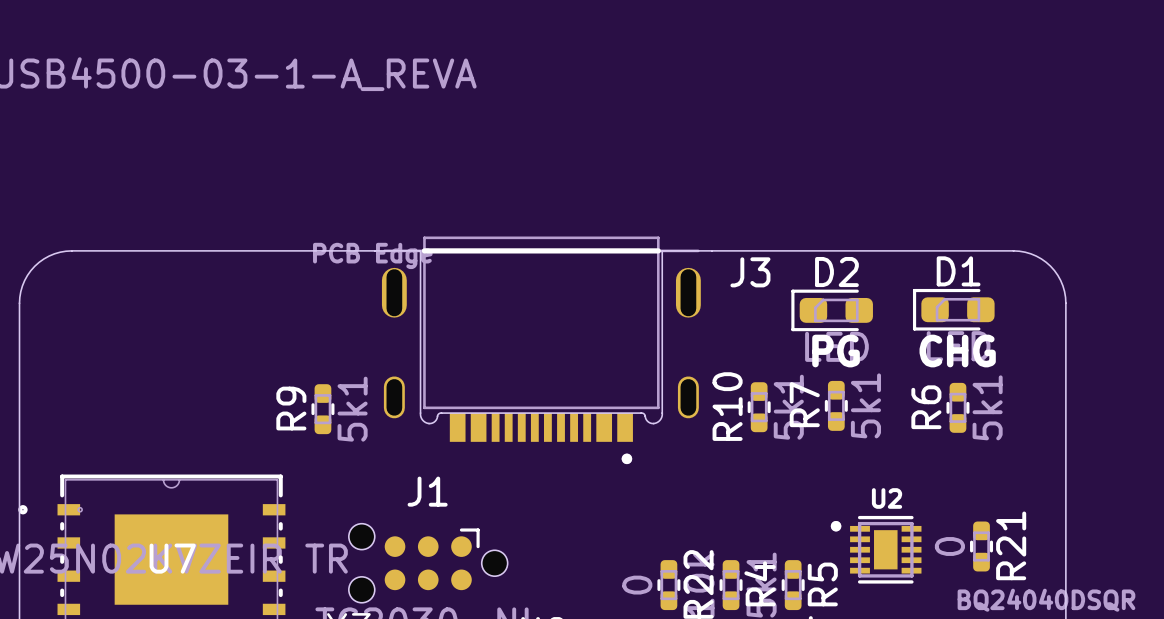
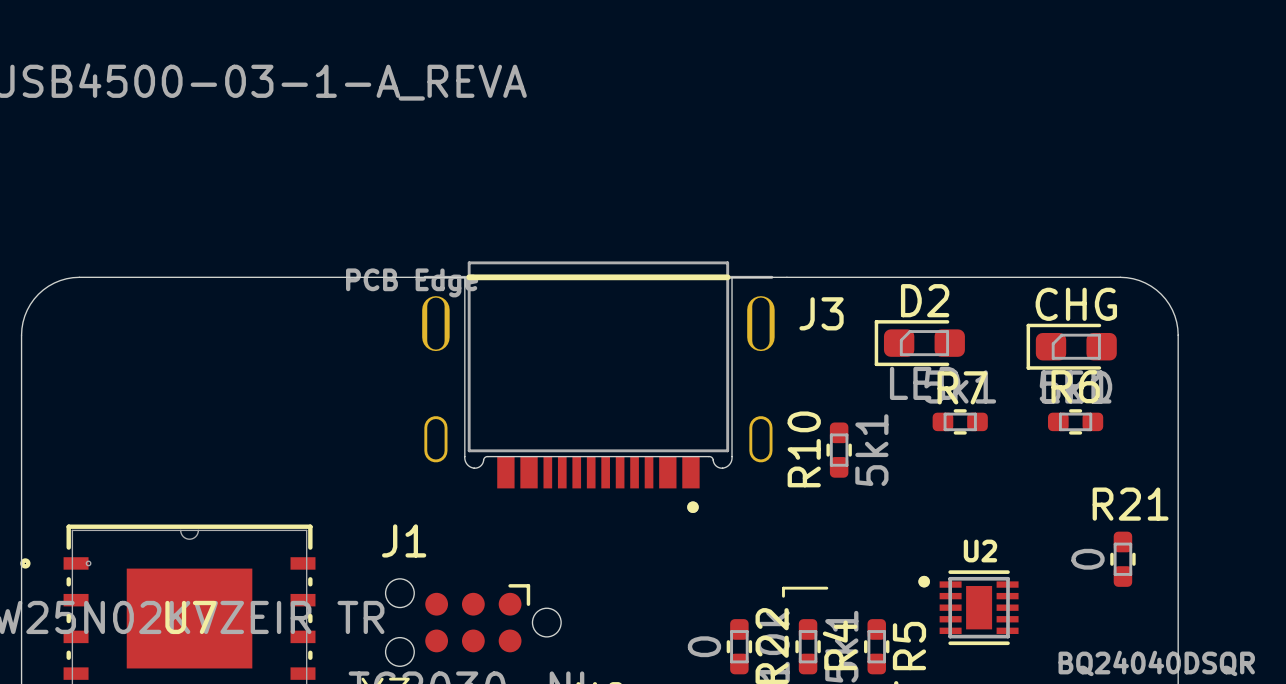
D1 name: D1 (958, 271) -> CHG (1076, 304)
J3 name position: J3 (750, 272) -> J3 (821, 313)
D1 position: (953, 309) -> (1071, 346)
text: PG (836, 351) -> none
text: CHG (957, 351) -> none
R7 rotation: 0° (836, 405) -> 90° clockwise (960, 421)
R7 position: (836, 405) -> (960, 421)
R6 rotation: 0° (957, 407) -> 90° clockwise (1075, 421)
R6 position: (957, 407) -> (1075, 421)
R9: 5k1 (322, 409) -> none
J1 name position: J1 (427, 491) -> J1 (404, 540)
line: none -> (826, 588) (783, 588) (783, 596)
R21 name rotation: 0° (1011, 545) -> 90° clockwise (1130, 504)
R21 position: (981, 546) -> (1122, 559)

